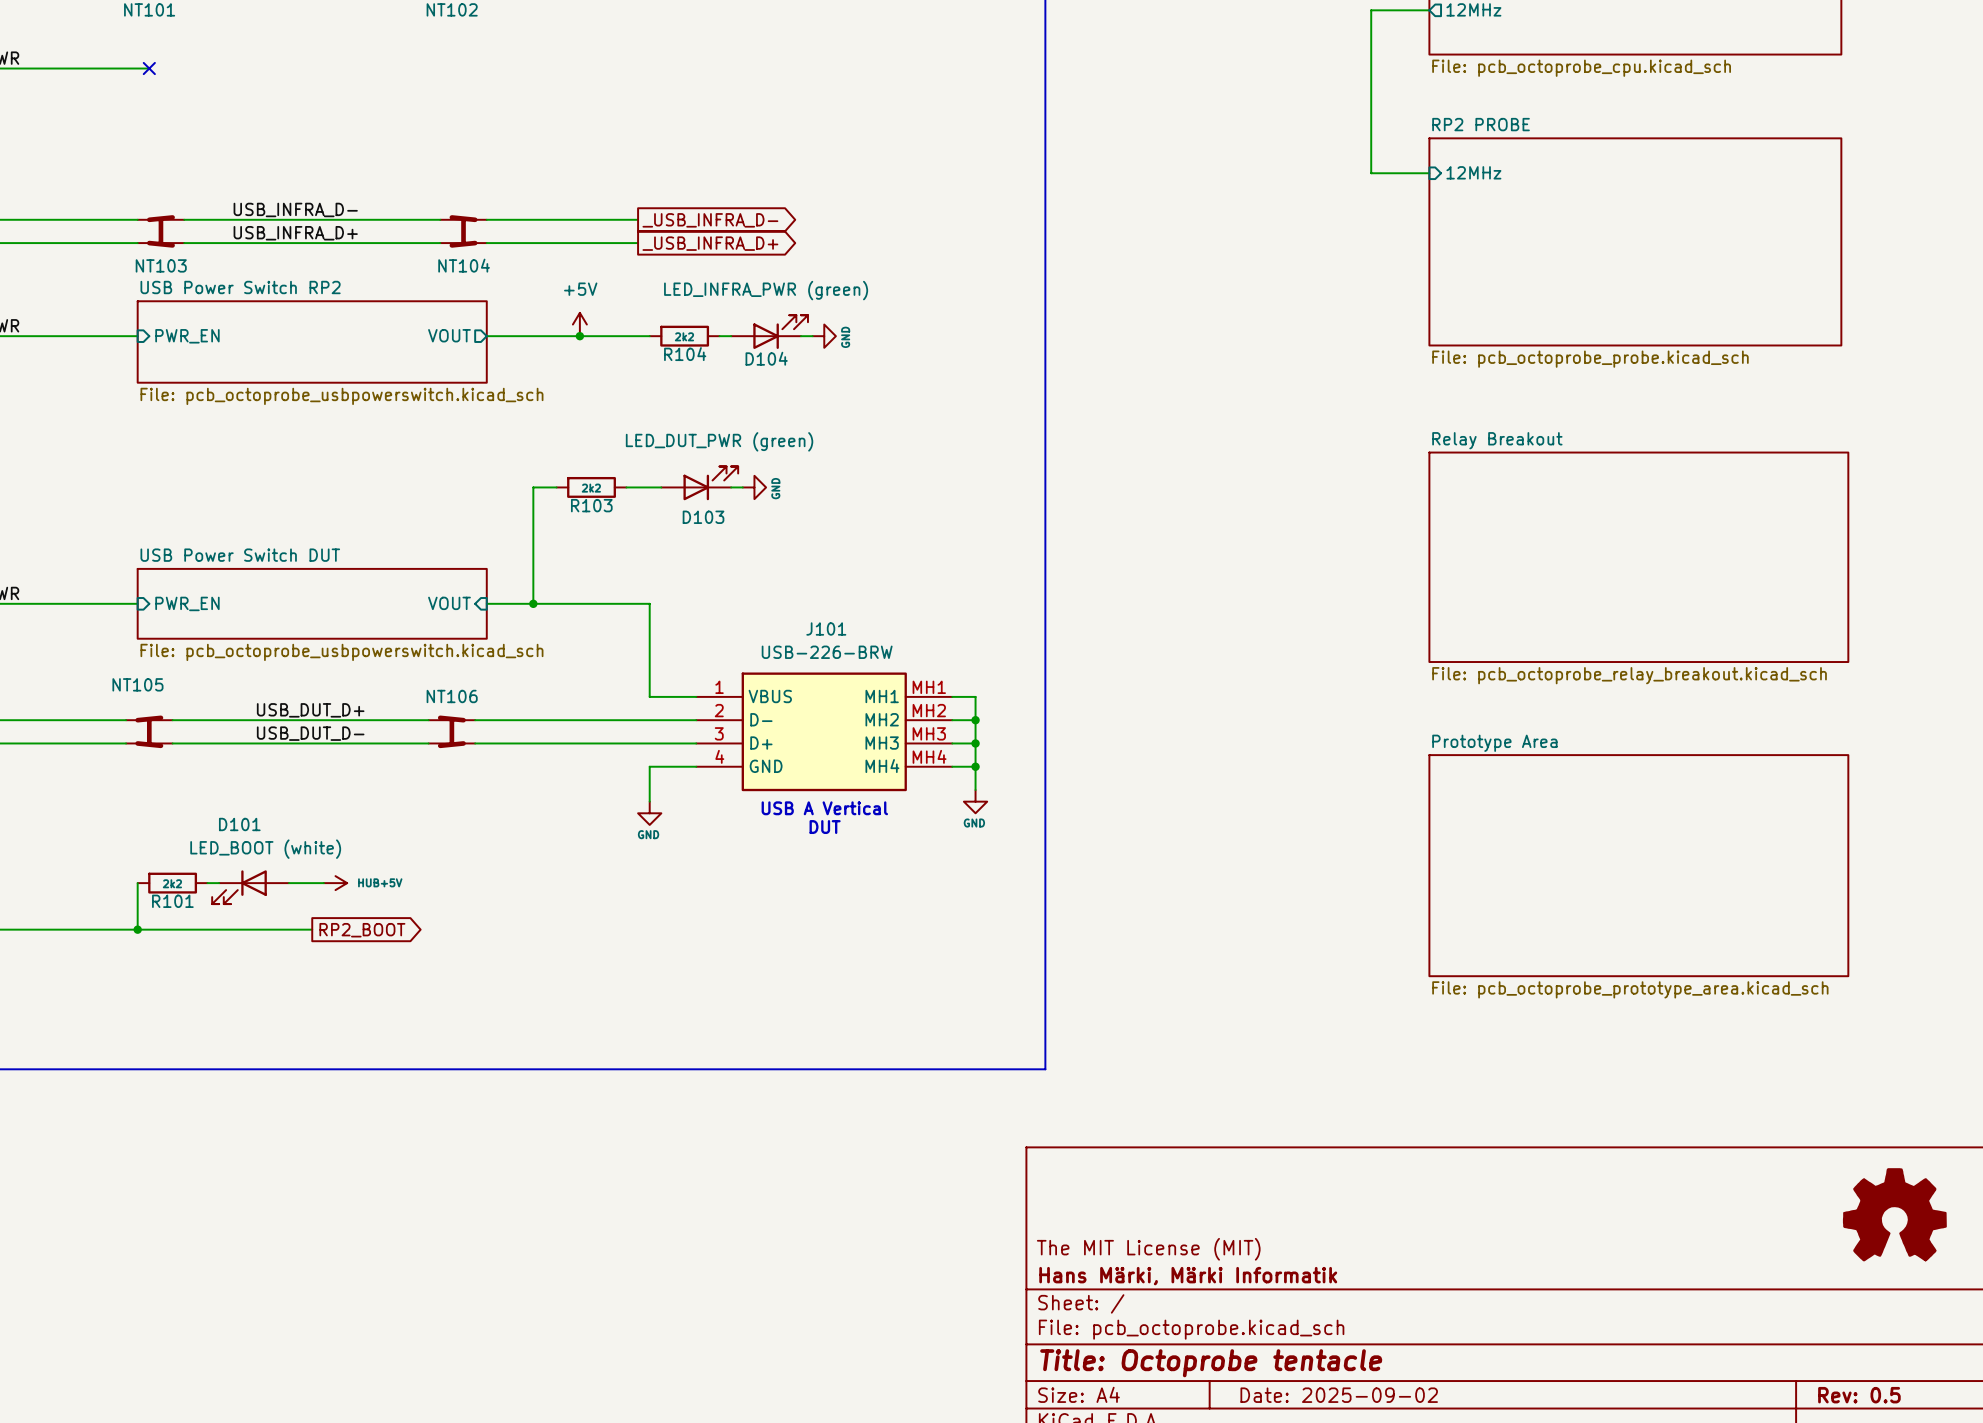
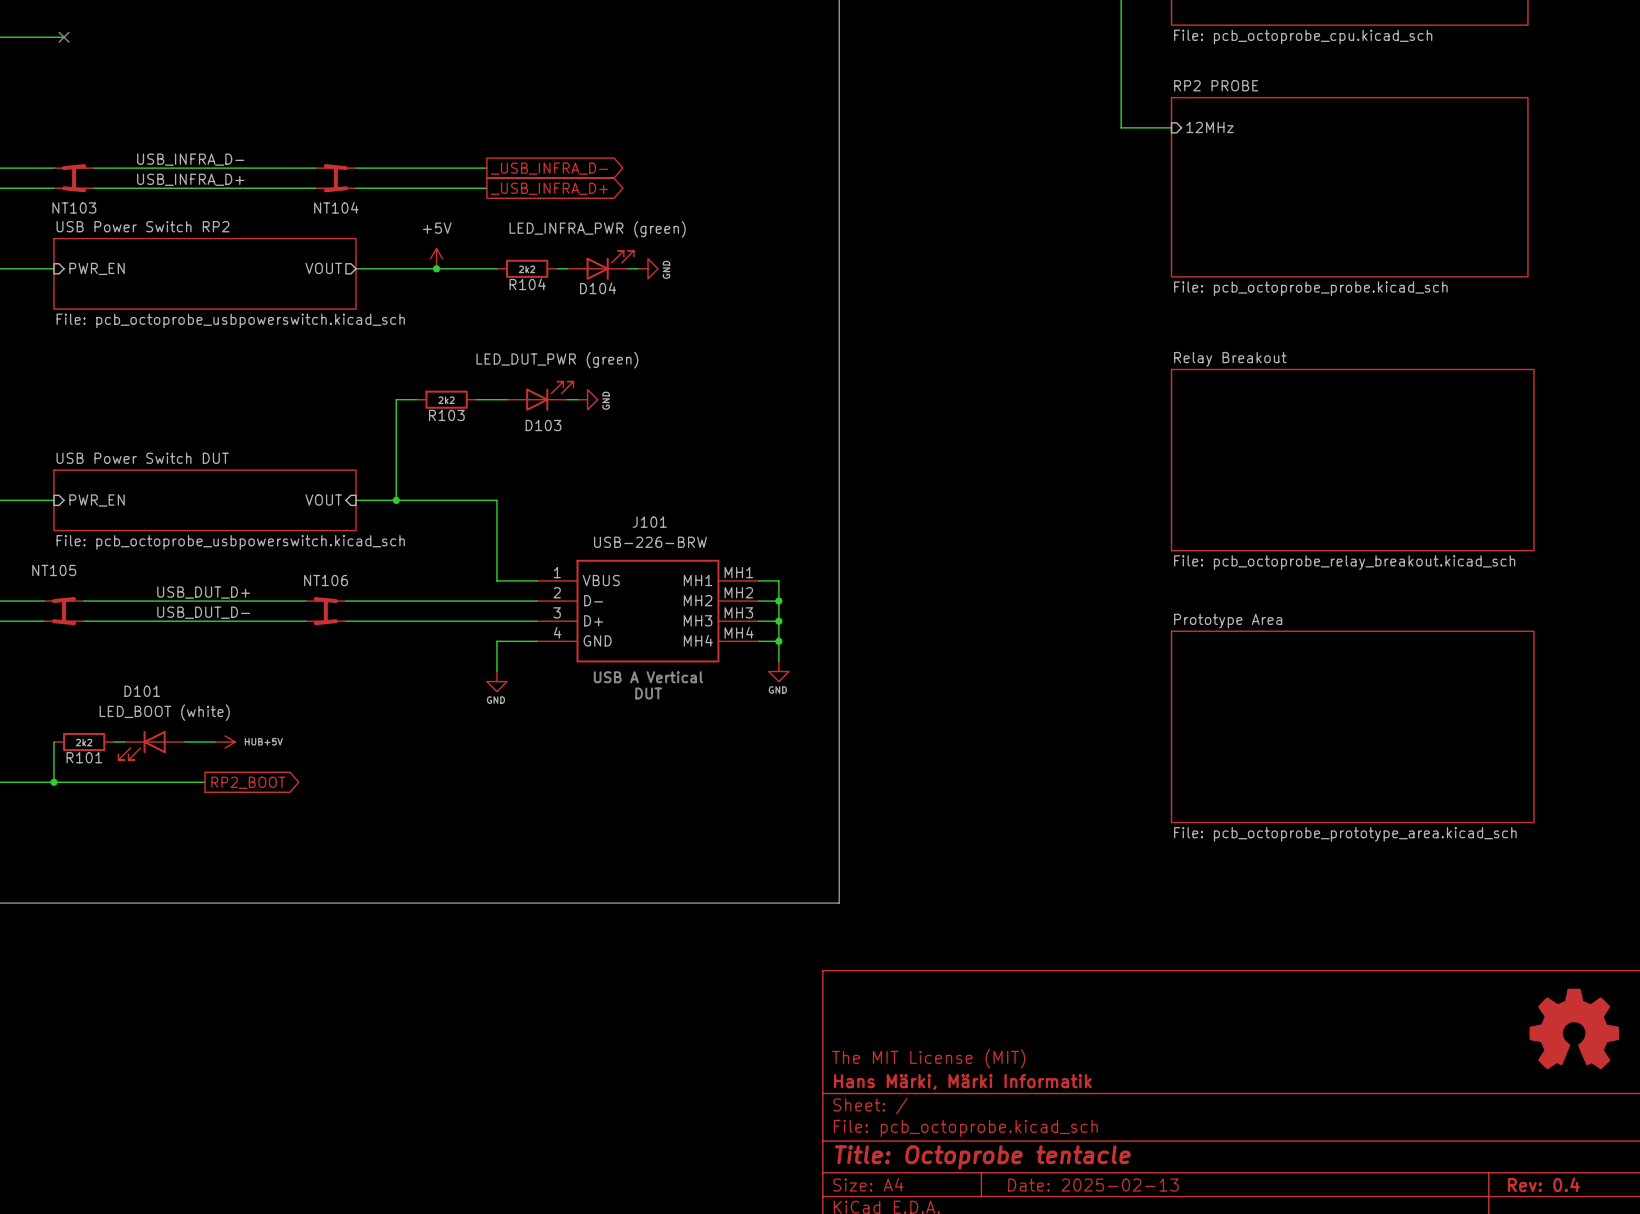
title block: Date: 2025-09-02 (1339, 1395) -> Date: 2025-02-13 (1093, 1185)
title block: Rev: 0.5 (1859, 1395) -> Rev: 0.4 (1543, 1184)

